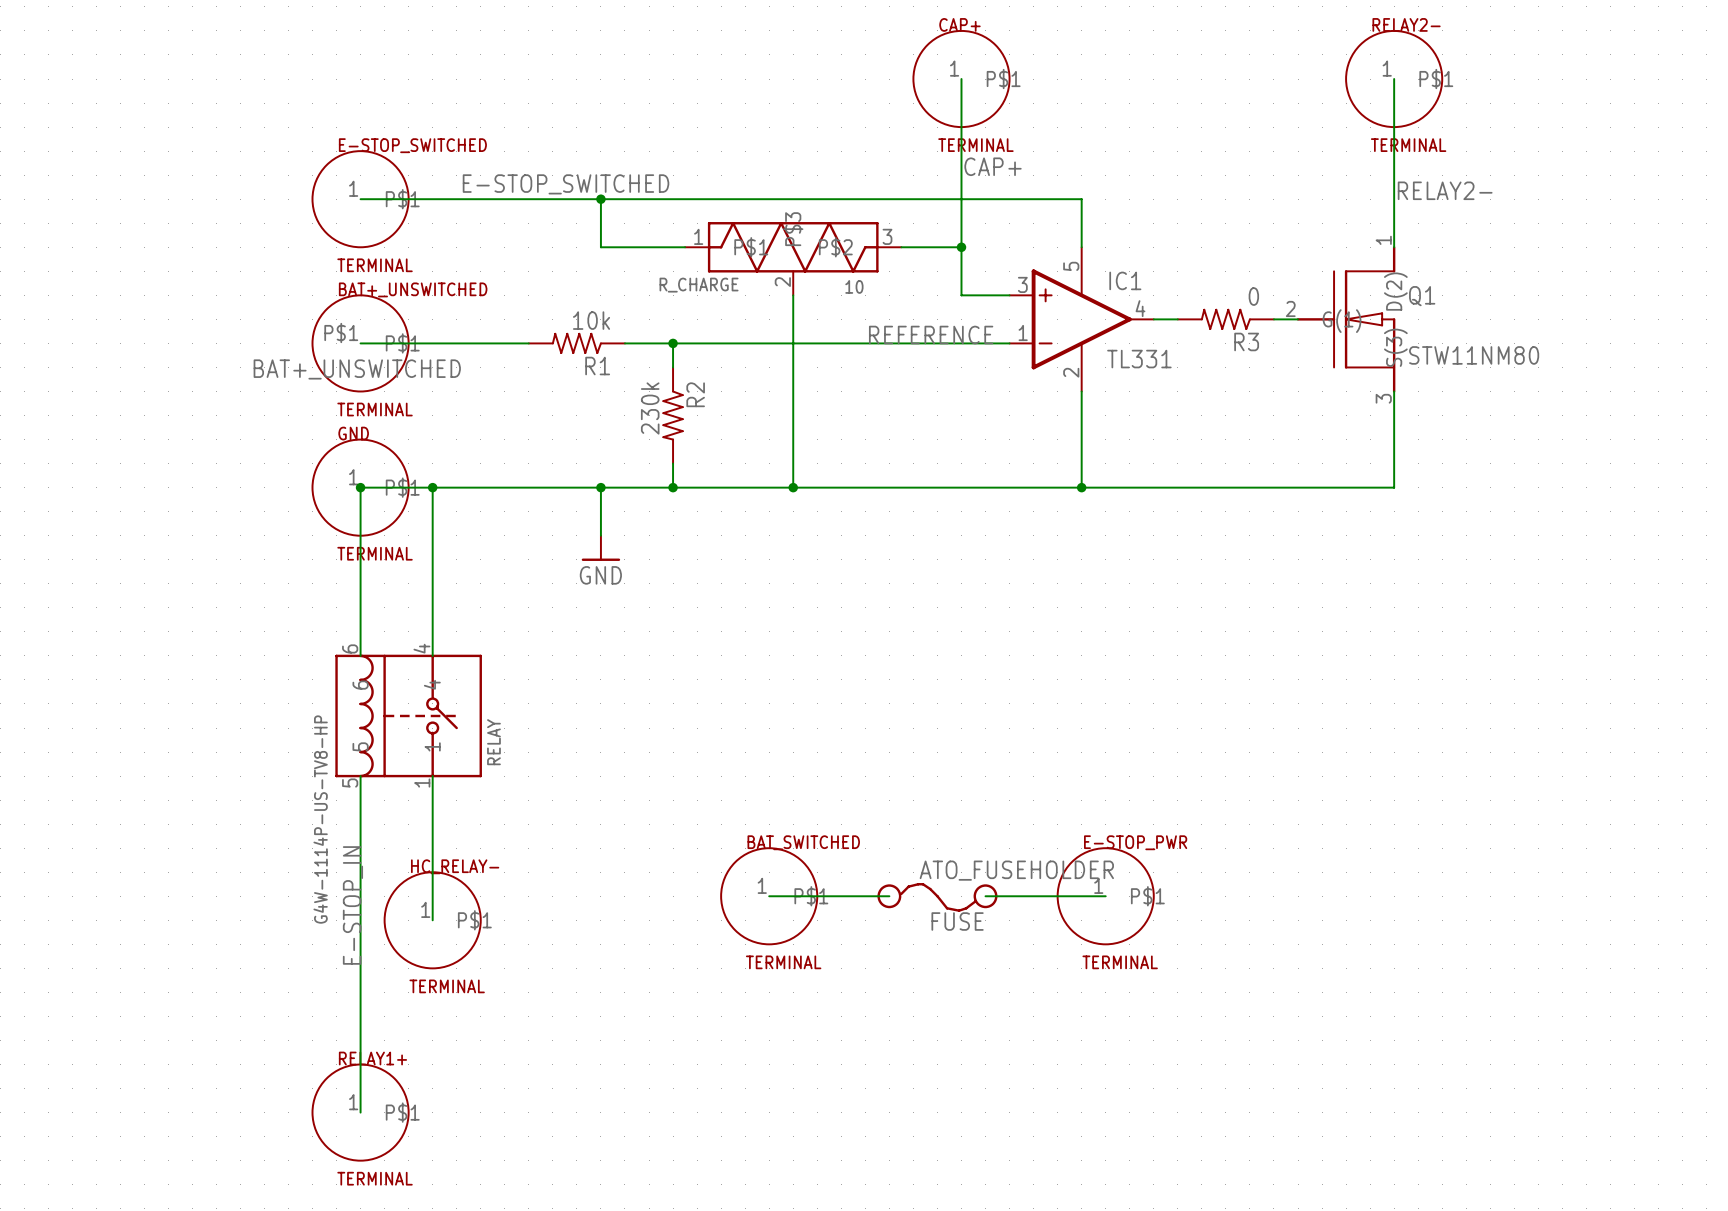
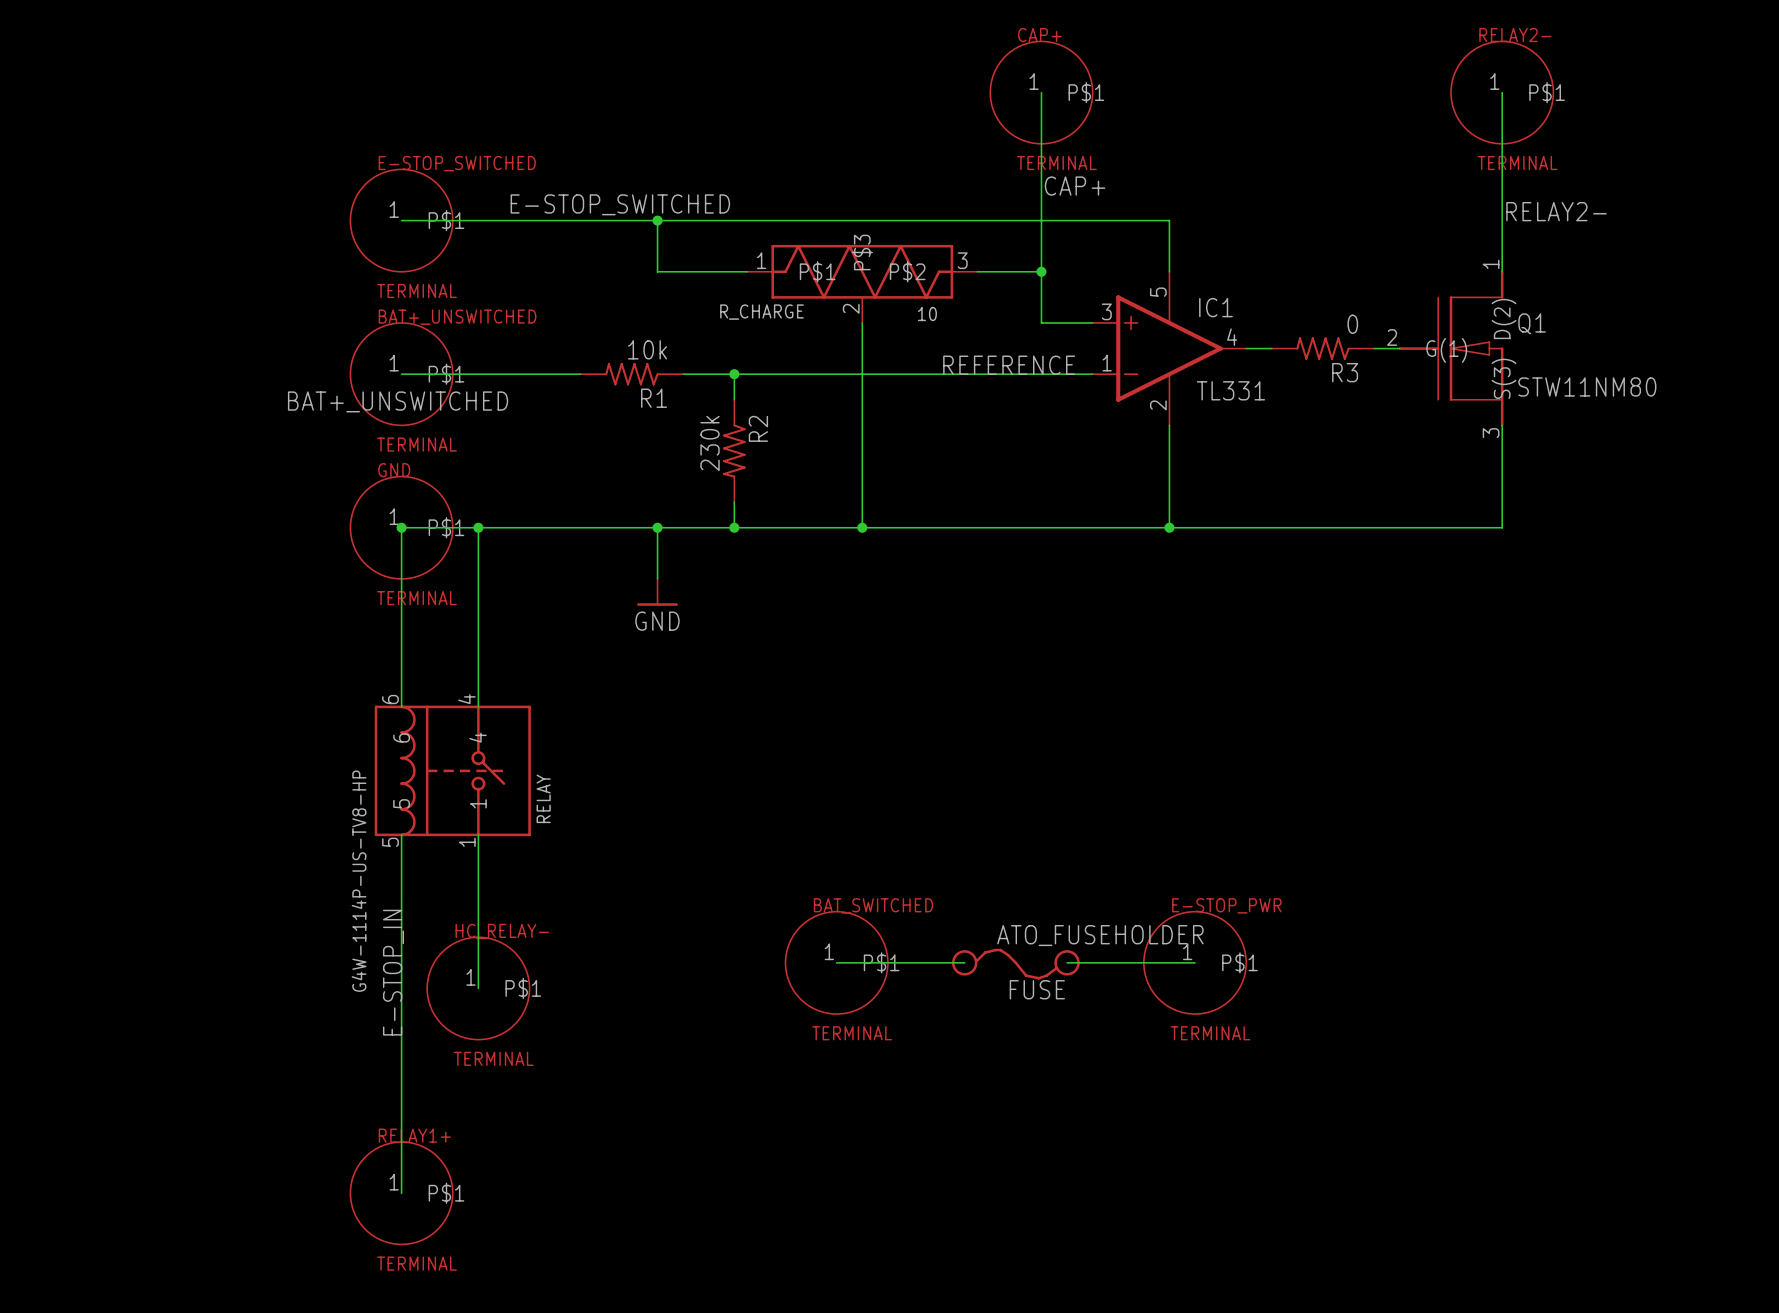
BAT+_UNSWITCHED pin number: P$1 (341, 333) -> 1 (394, 363)

